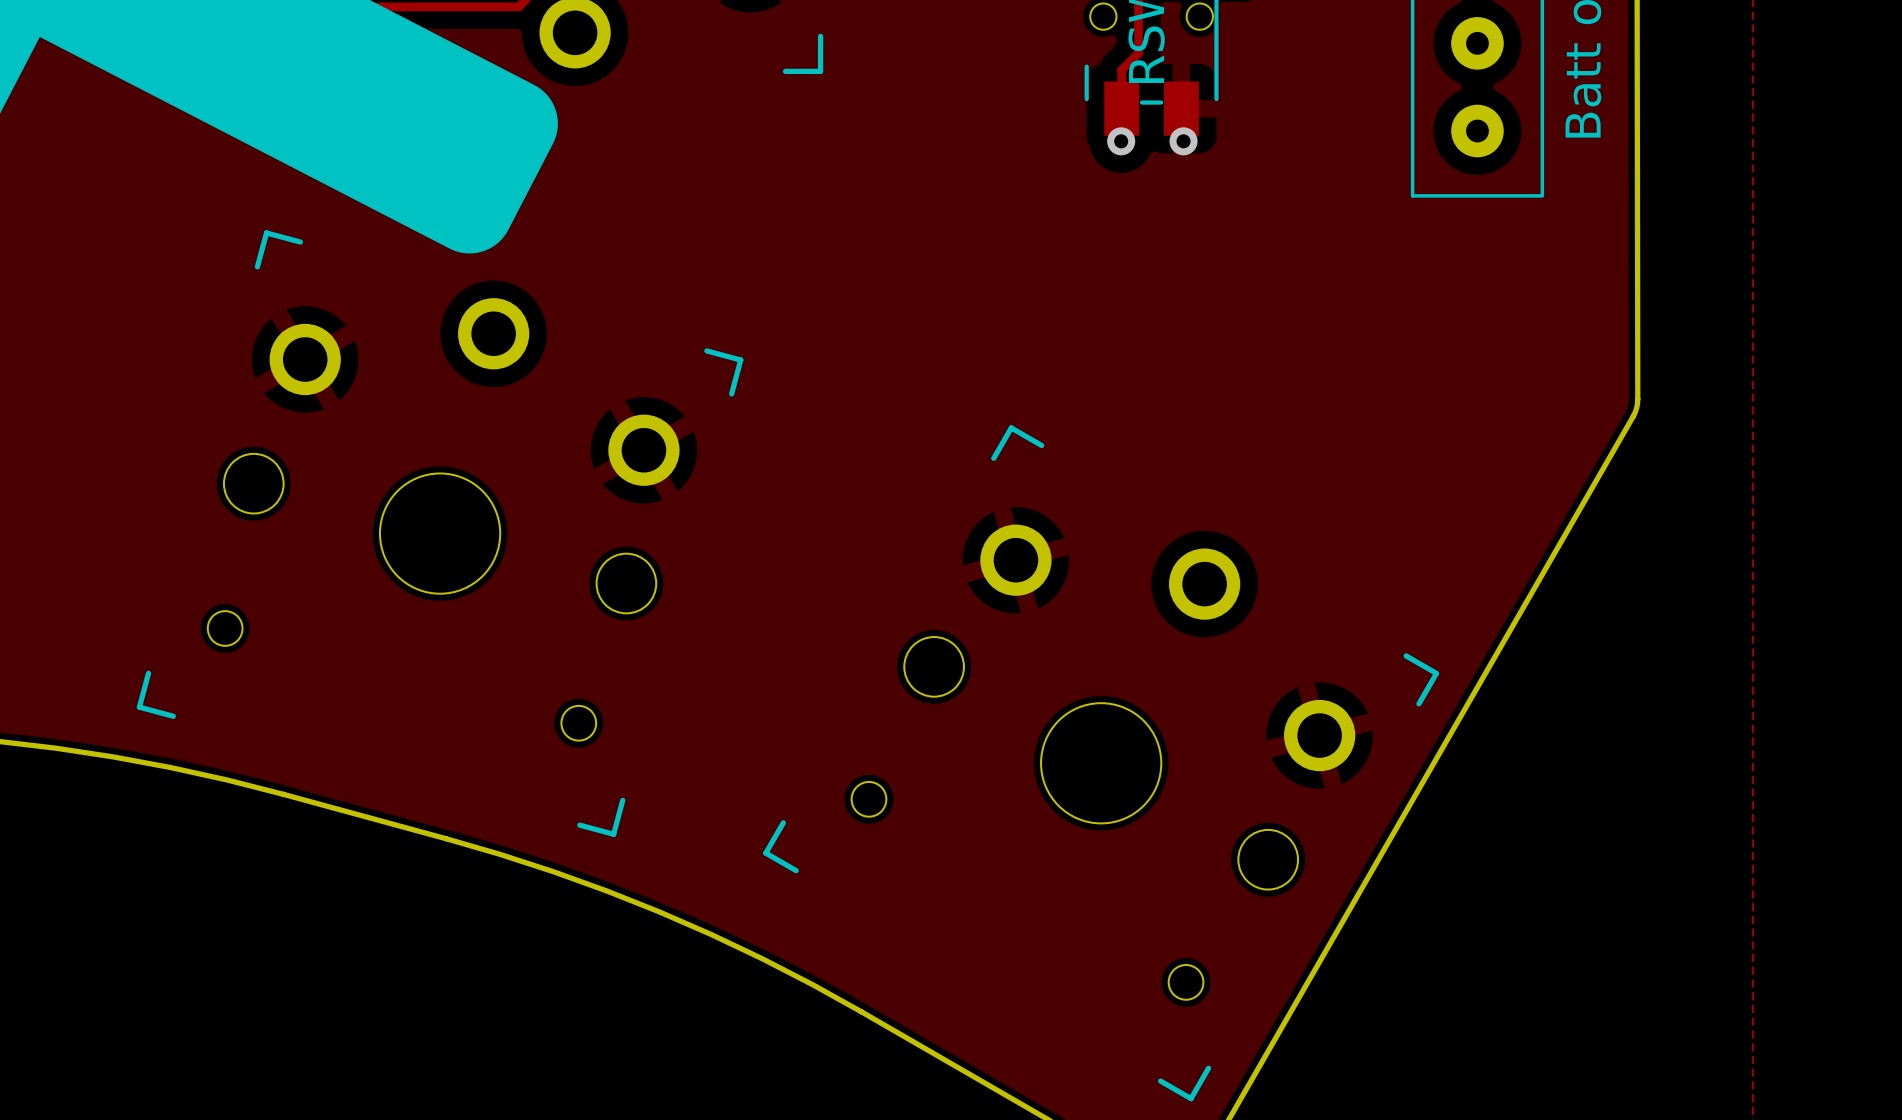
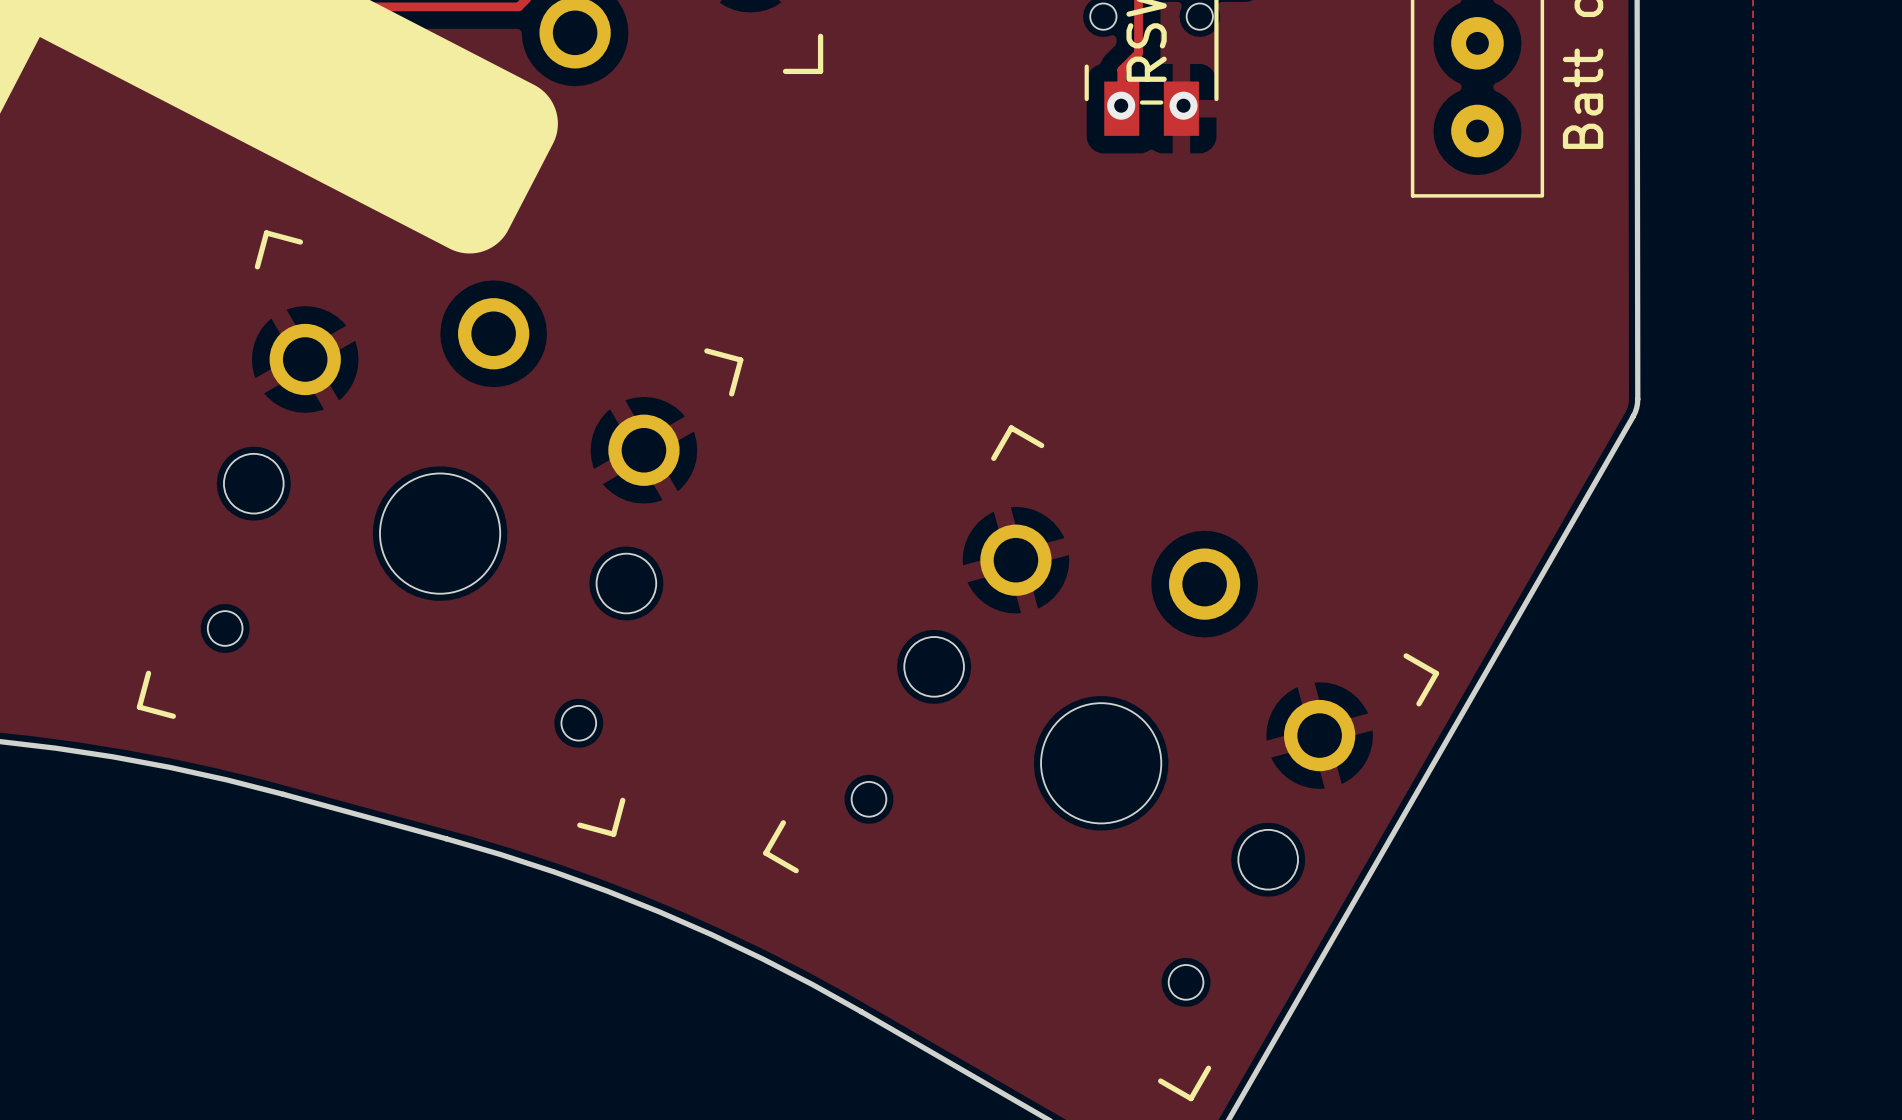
via: none -> (1121, 105)
via: none -> (1183, 105)
via: (1121, 141) -> none
via: (1183, 141) -> none

